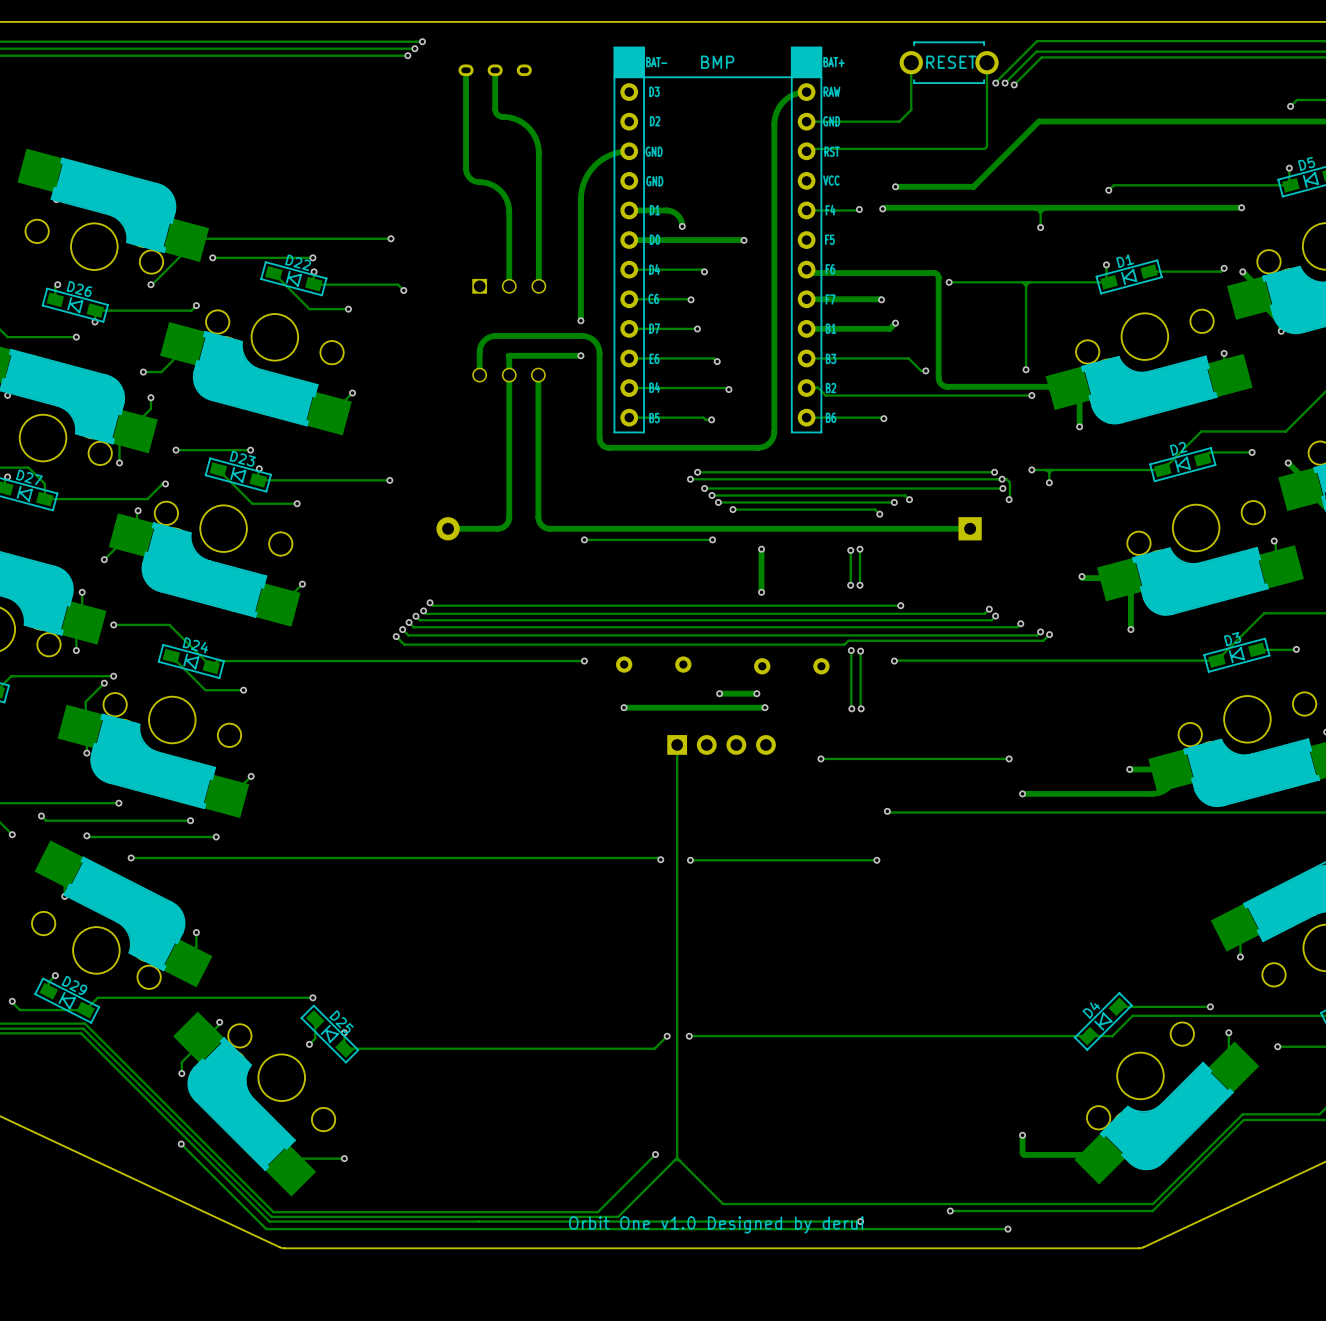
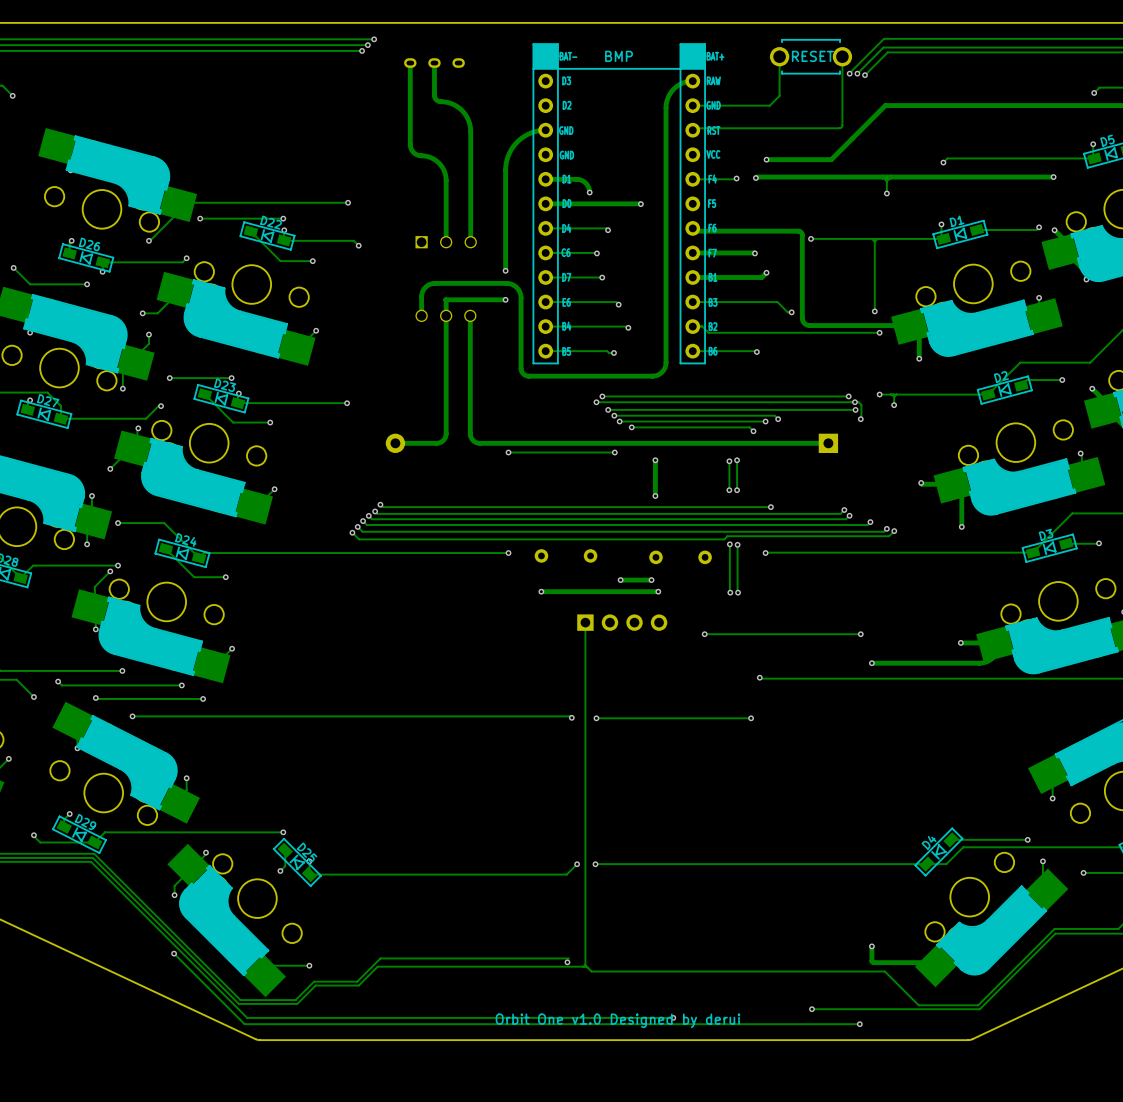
track: (655, 1154) (597, 1212) (273, 1212) (261, 1200) -> (568, 958) (380, 958) (357, 981) (314, 981) (295, 1000) (240, 1000)
track: (675, 1160) (618, 1216) (271, 1216) (259, 1204) -> (583, 966) (377, 966) (358, 985) (315, 985) (297, 1003) (238, 1003)
track: (684, 1165) (723, 1204) (1153, 1204) -> (591, 971) (884, 971) (918, 1005) (978, 1005) (980, 1003)
via: none -> (673, 1017)
track: (860, 1221) (783, 1221) -> none
via: (860, 1221) -> none

